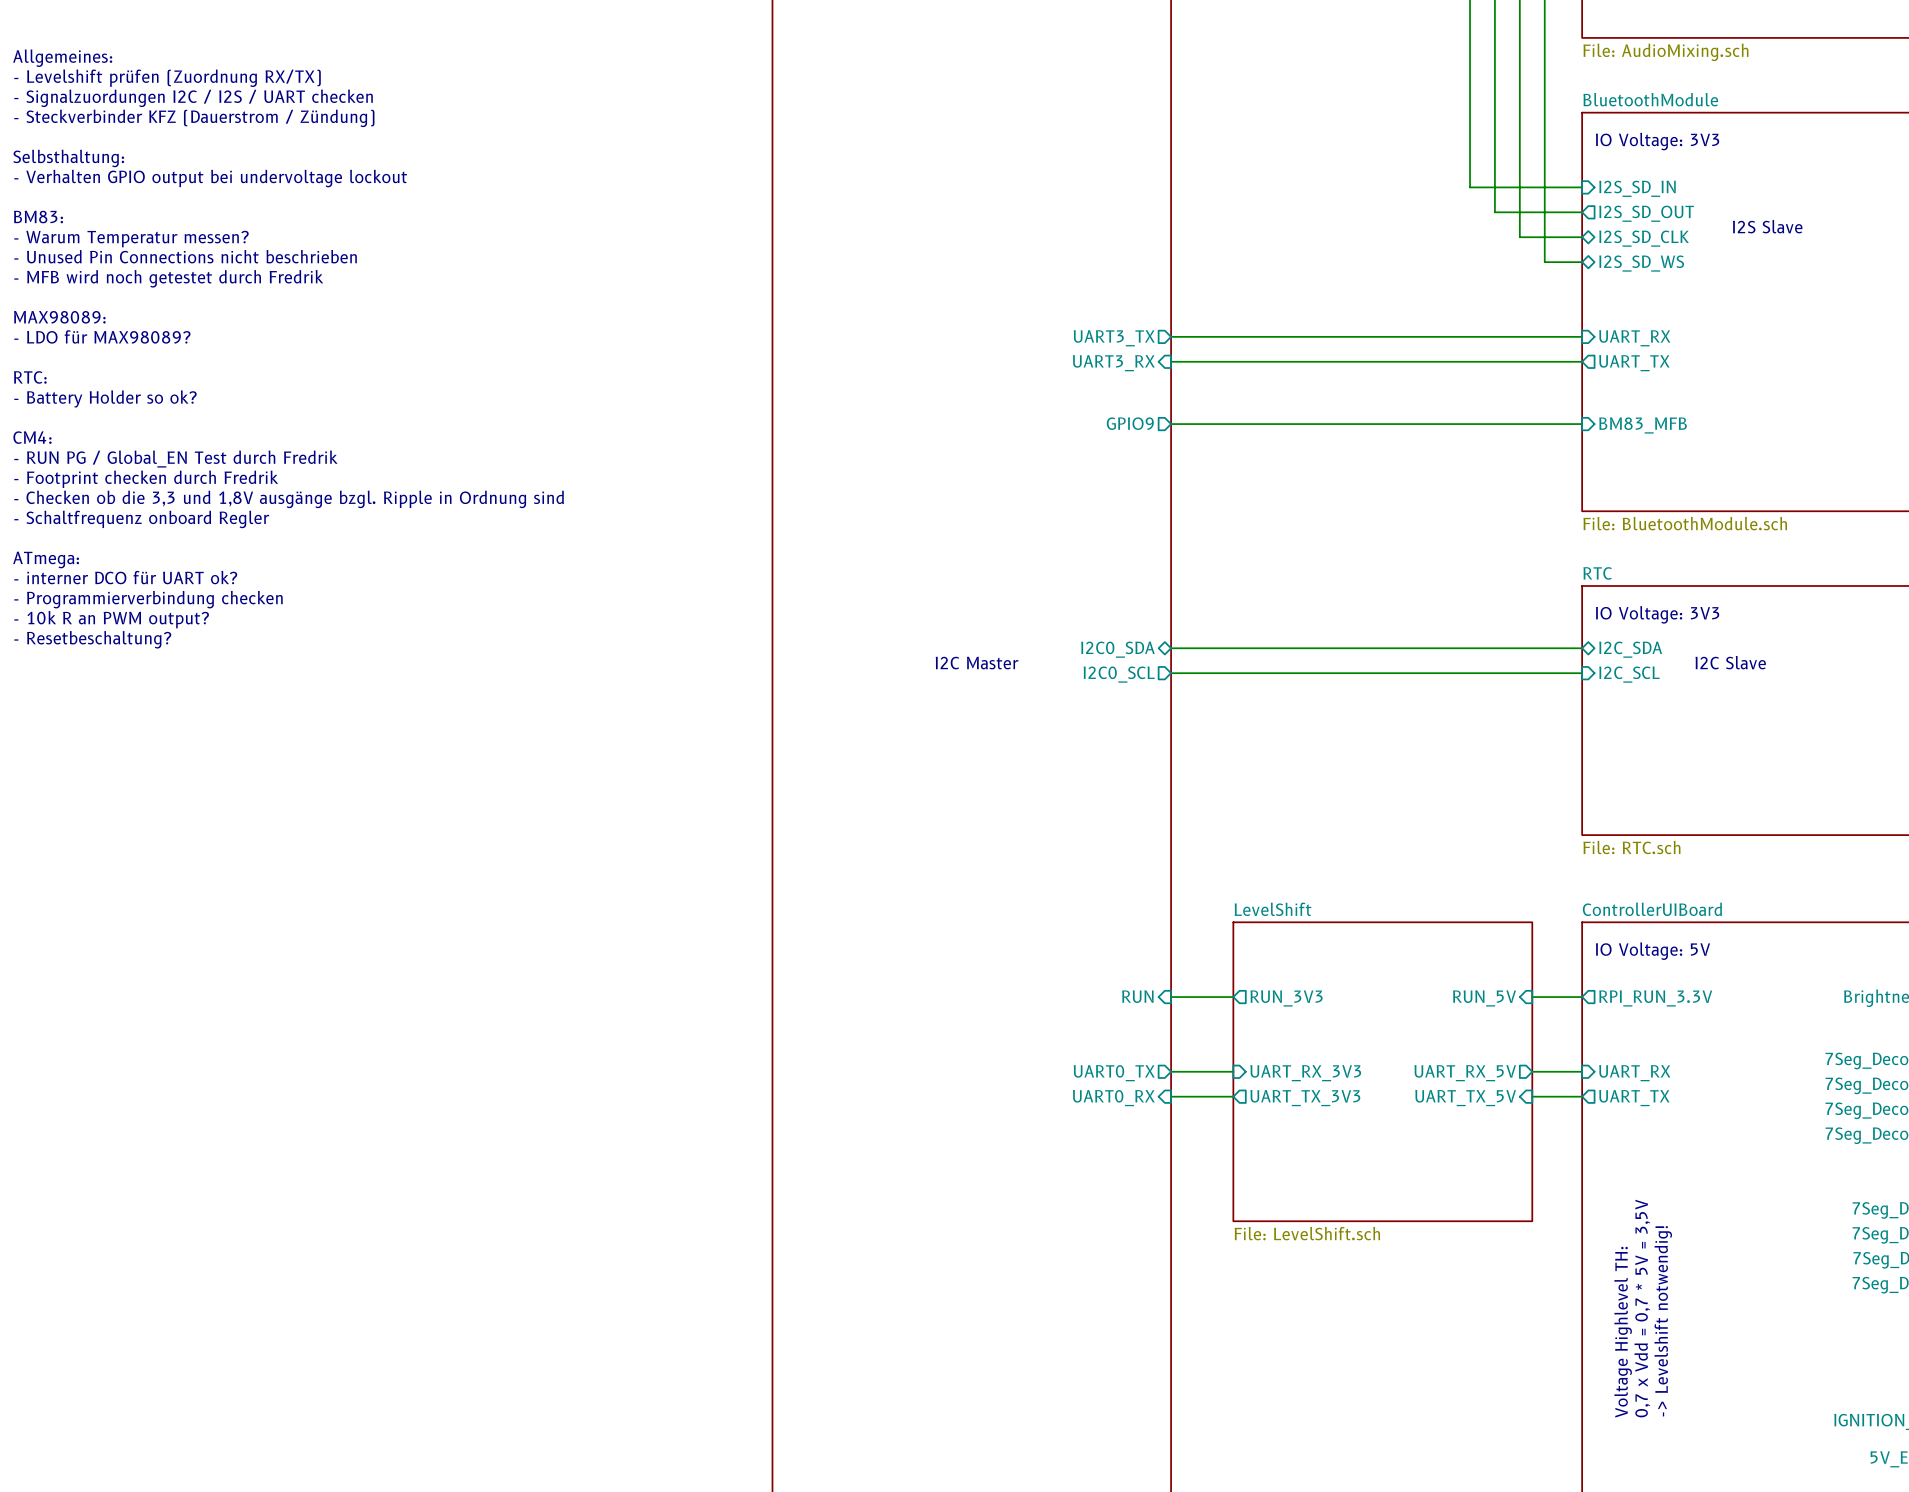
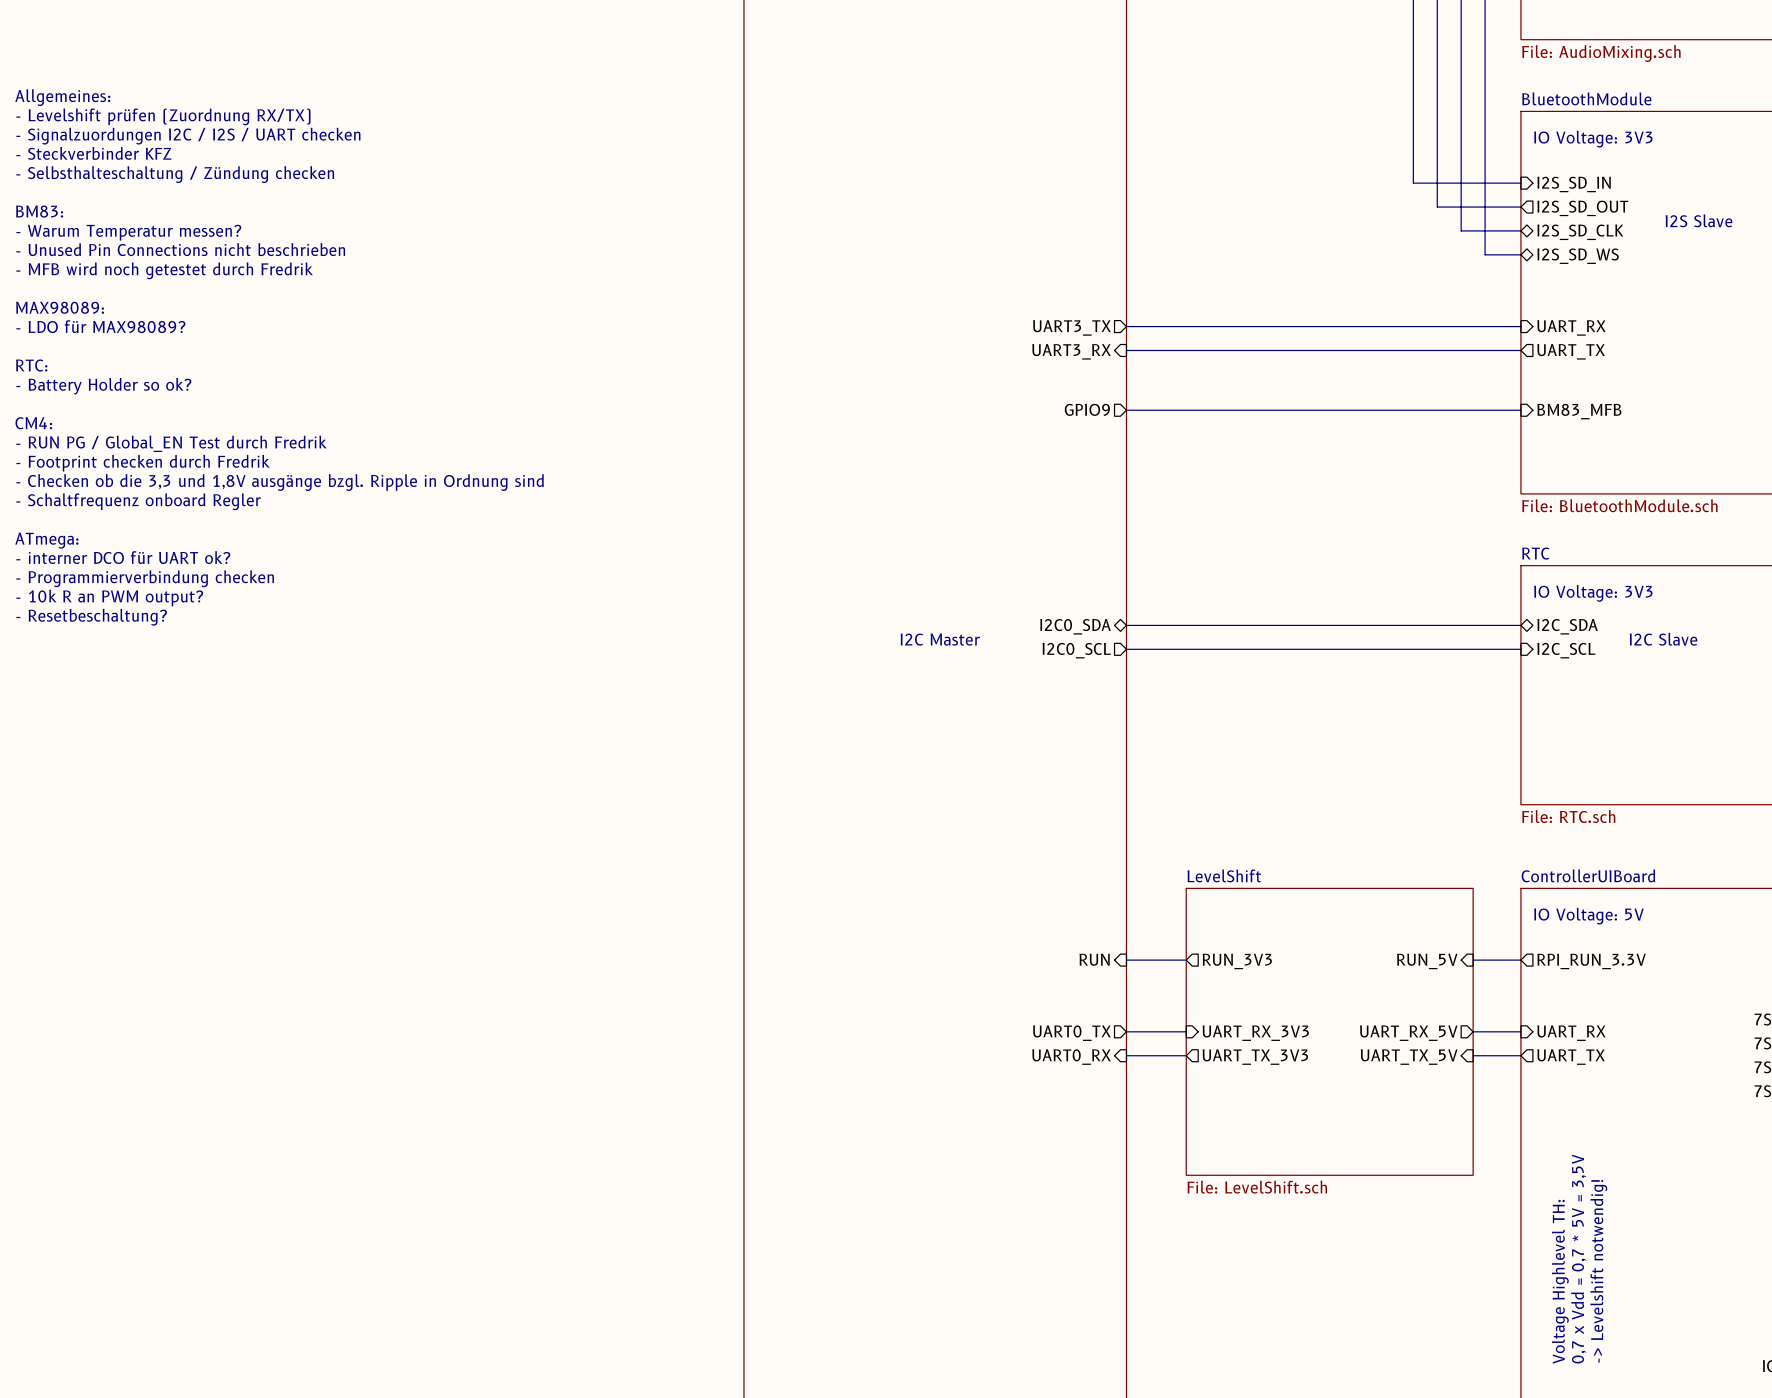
text: Allgemeines: (62, 58) -> none
text: - Levelshift prüfen (Zuordnung RX/TX) (167, 78) -> none
text: - Signalzuordungen I2C / I2S / UART checken (193, 98) -> Allgemeines: (62, 97)
text: - Steckverbinder KFZ (Dauerstrom / Zündung) (194, 118) -> - Levelshift prüfen (Zuordnung RX/TX) (163, 116)
text: none -> - Signalzuordungen I2C / I2S / UART checken (188, 136)
text: Selbsthaltung: (68, 158) -> - Steckverbinder KFZ (93, 153)
text: - Verhalten GPIO output bei undervoltage lockout (210, 178) -> - Selbsthalteschaltung / Zündung checken (175, 174)

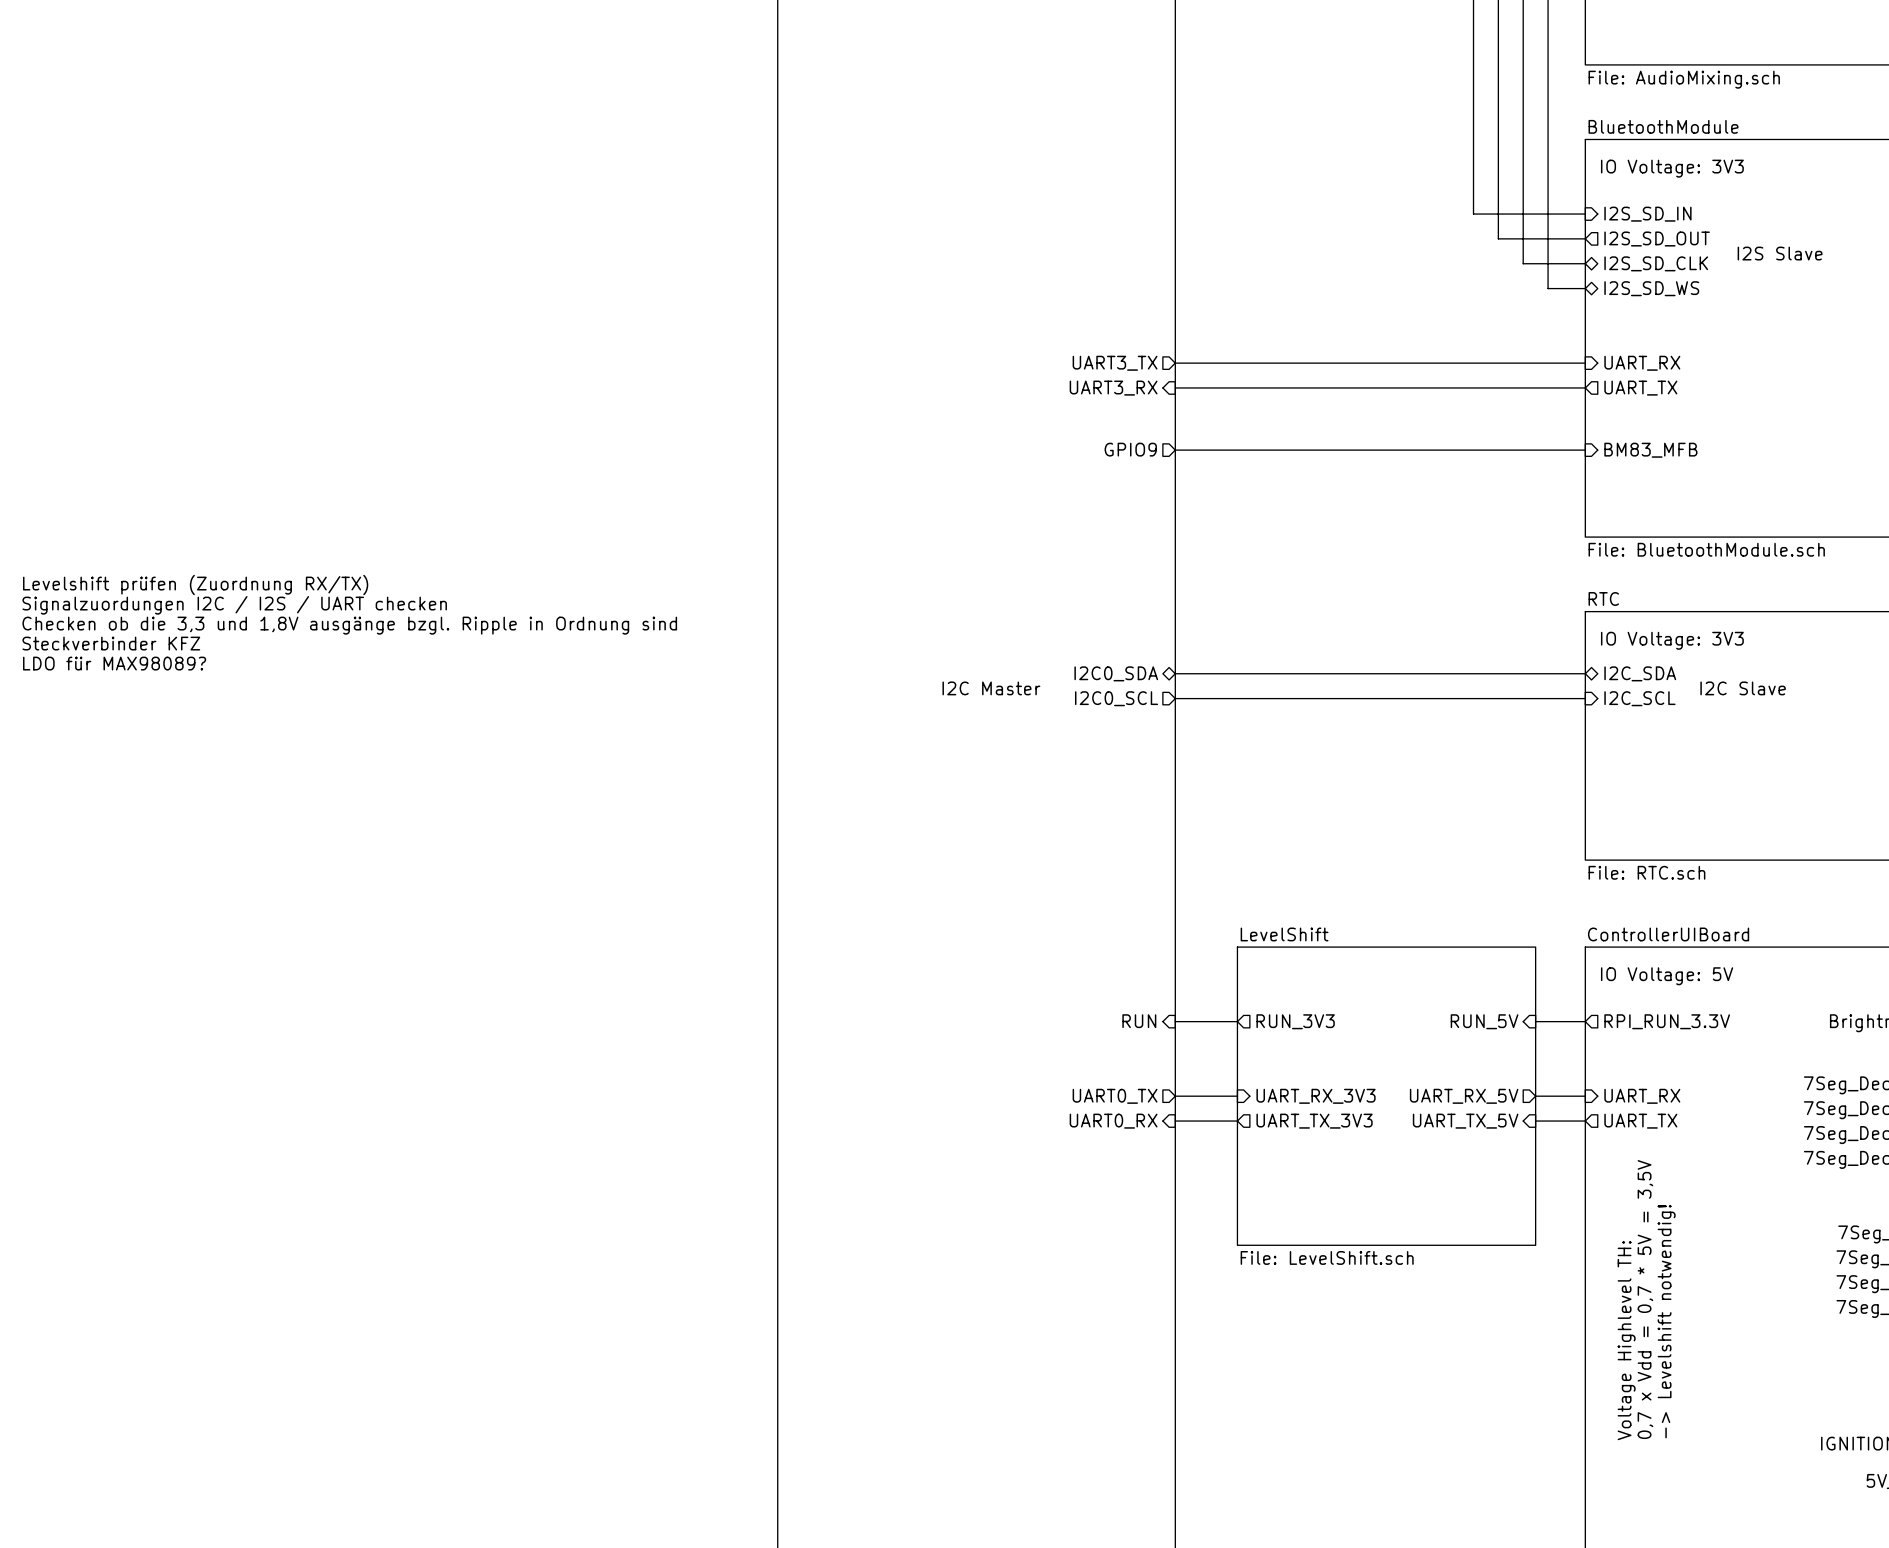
text: Allgemeines: (62, 97) -> none
text: - Levelshift prüfen (Zuordnung RX/TX) (163, 116) -> none
text: - Signalzuordungen I2C / I2S / UART checken (188, 136) -> none
text: - Steckverbinder KFZ (93, 153) -> none
text: - Selbsthalteschaltung / Zündung checken (175, 174) -> none
text: BM83: (39, 211) -> none
text: - Warum Temperatur messen? (128, 232) -> none
text: - Unused Pin Connections nicht beschrieben (180, 249) -> none
text: - MFB wird noch getestet durch Fredrik (164, 270) -> none
text: MAX98089: (60, 307) -> none
text: - LDO für MAX98089? (100, 326) -> none
text: RTC: (31, 365) -> none
text: - Battery Holder so ok? (103, 386) -> none
text: CM4: (33, 423) -> none
text: - RUN PG / Global_EN Test durch Fredrik (171, 443) -> none
text: - Footprint checken durch Fredrik (142, 463) -> none
text: - Checken ob die 3,3 und 1,8V ausgänge bzgl. Ripple in Ordnung sind (280, 482) -> none
text: - Schaltfrequenz onboard Regler (138, 501) -> none
text: ATmega: (46, 540) -> Levelshift prüfen (Zuordnung RX/TX) (195, 585)
text: - interner DCO für UART ok? (123, 557) -> Signalzuordungen I2C / I2S / UART checken (234, 605)
text: - Programmierverbindung checken (145, 578) -> Checken ob die 3,3 und 1,8V ausgänge bzgl. Ripple in Ordnung sind (349, 625)
text: - 10k R an PWM output? (109, 597) -> Steckverbinder KFZ (111, 643)
text: - Resetbeschaltung? (91, 617) -> LDO für MAX98089? (114, 663)

